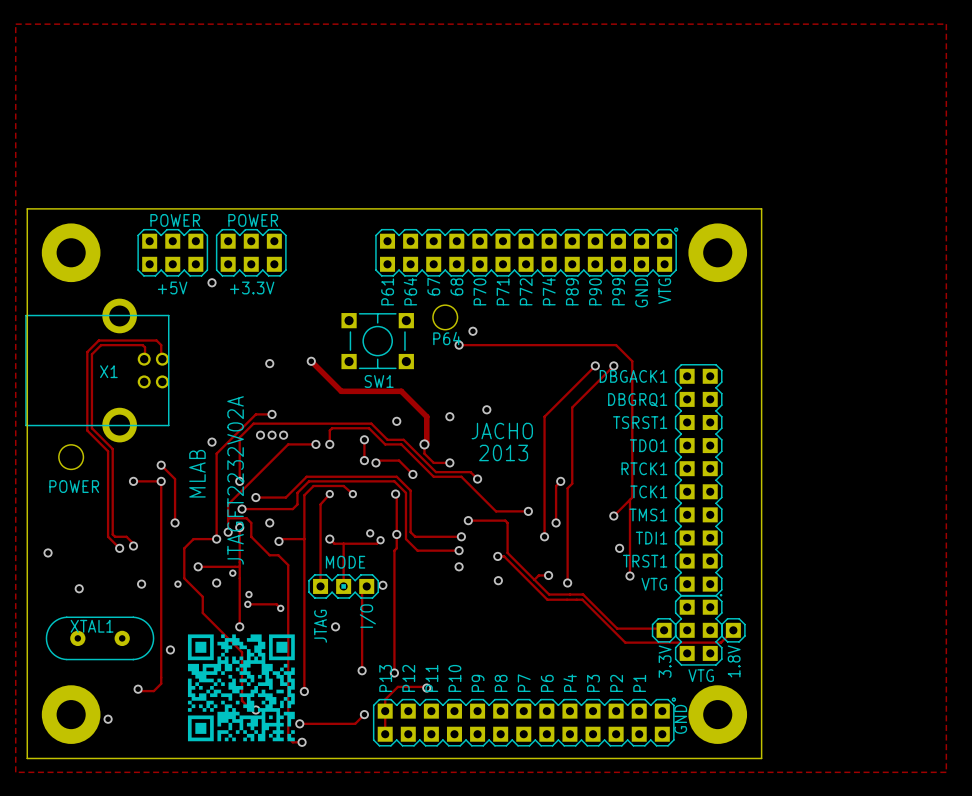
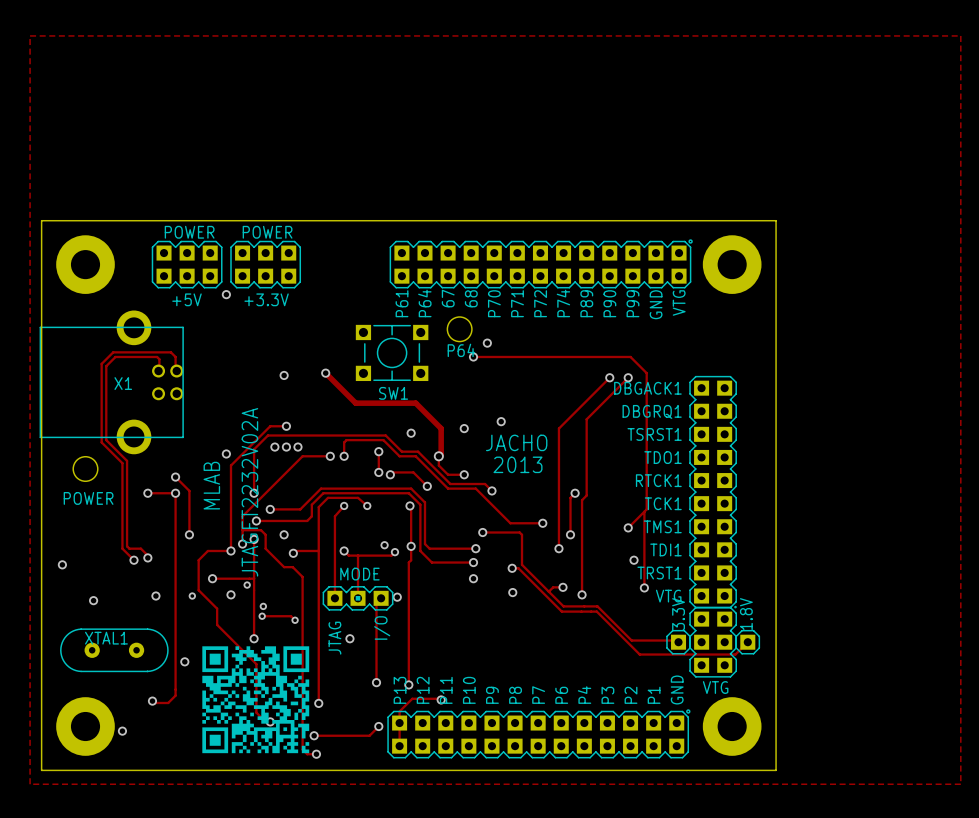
text position: 3.3V (665, 661) -> 3.3V (678, 614)
text position: 1.8V (734, 661) -> 1.8V (746, 614)
text position: GND (680, 719) -> GND (677, 689)

